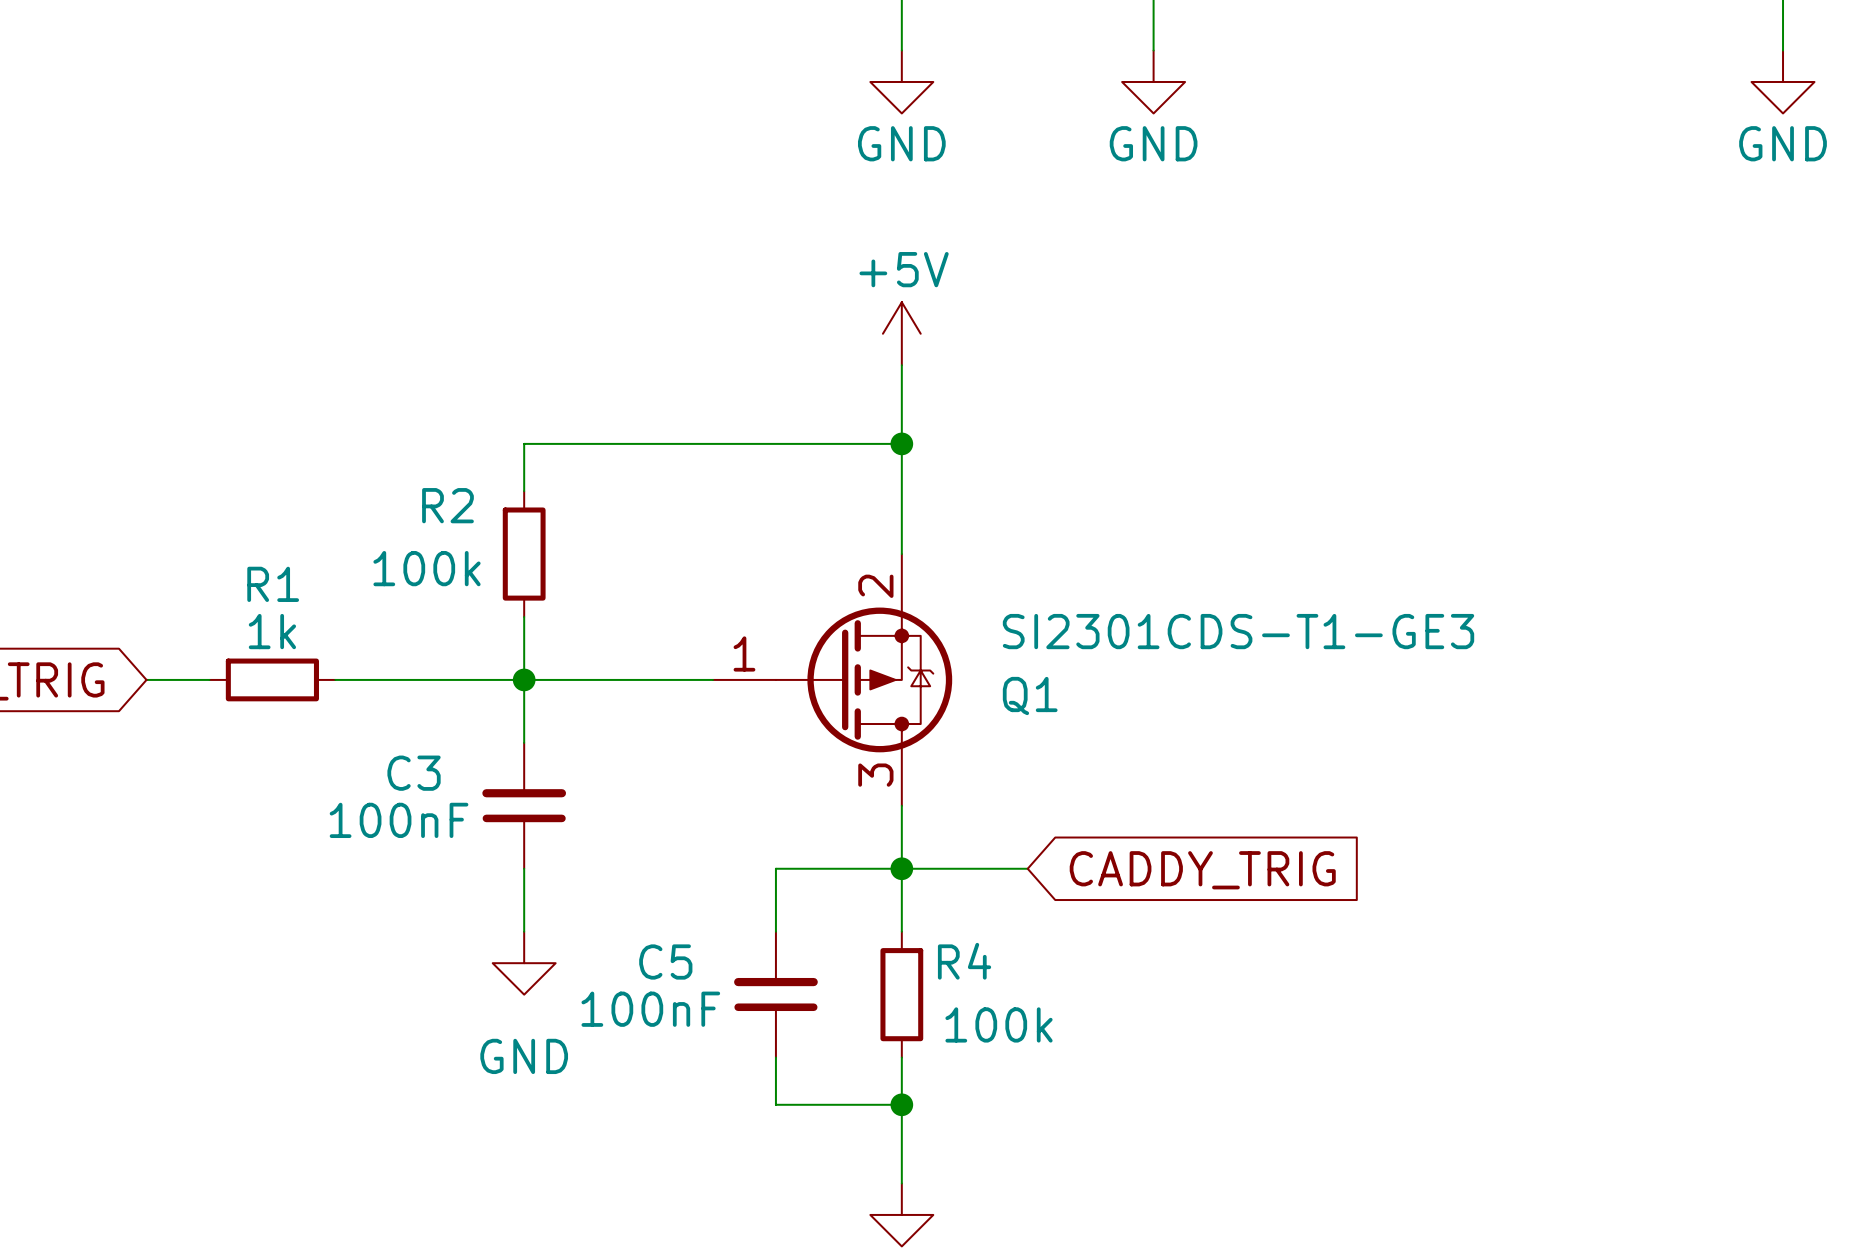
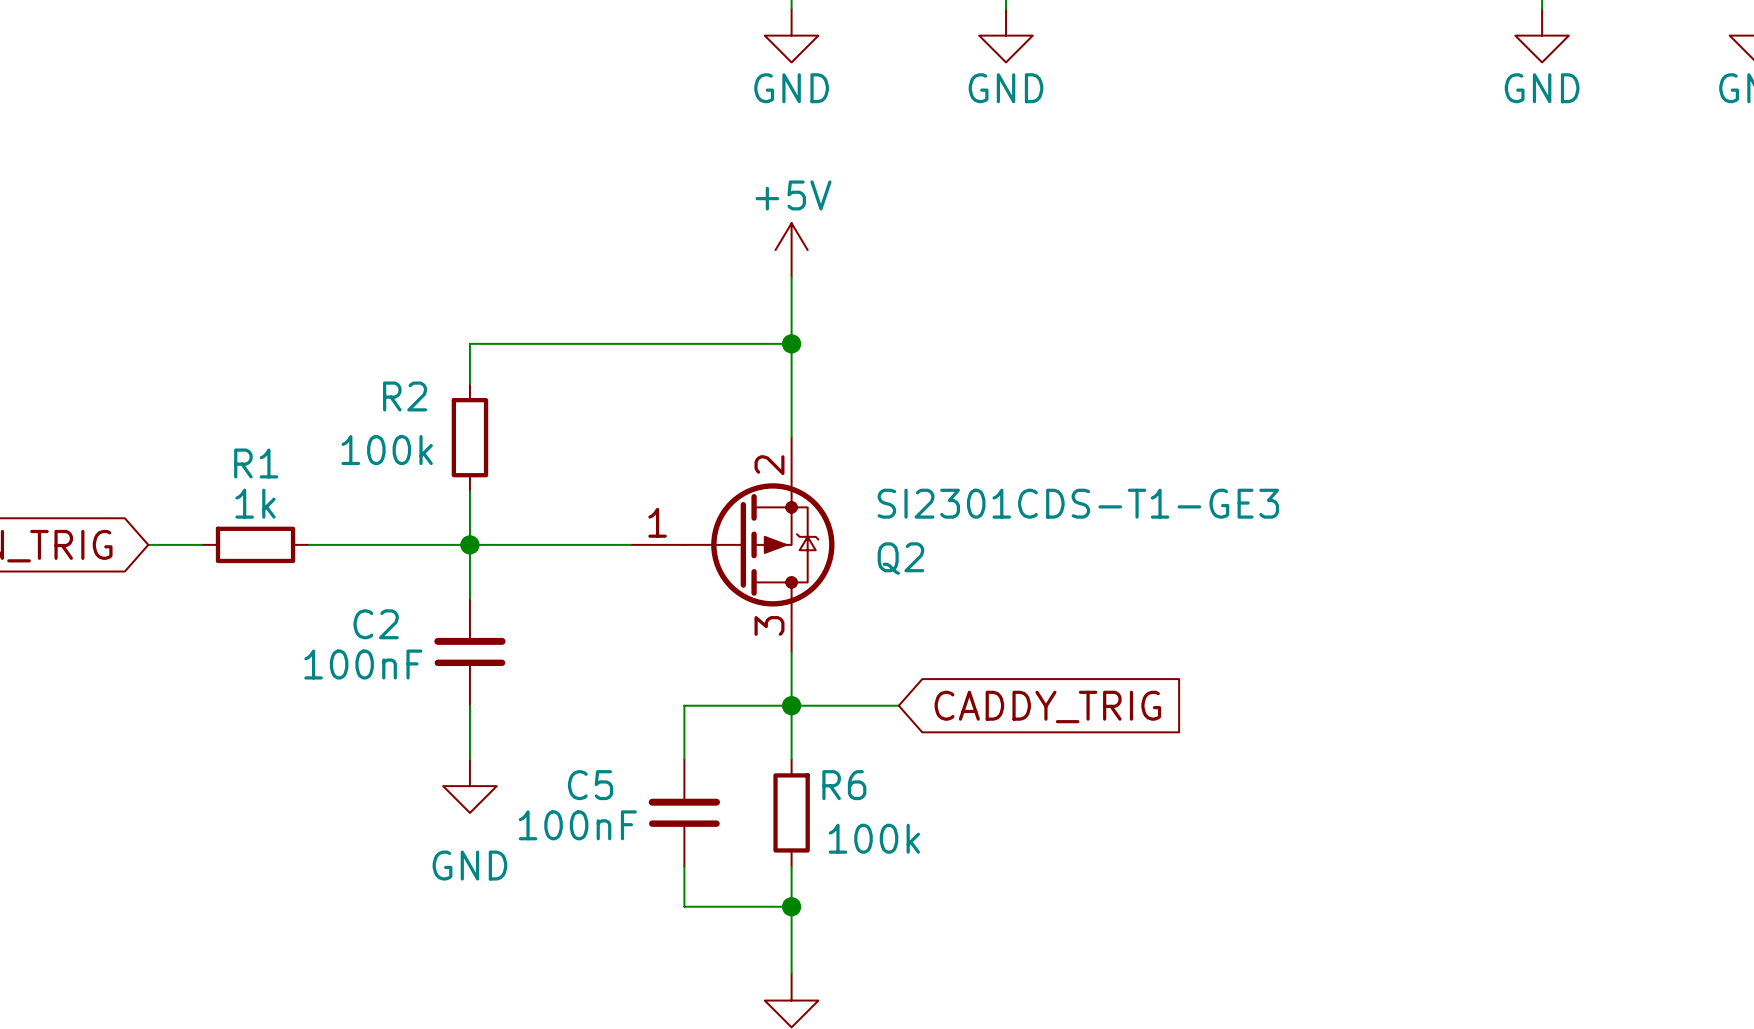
Q1 name: Q1 (1030, 696) -> Q2 (900, 558)
C3 name: C3 (414, 773) -> C2 (376, 624)
R4 name: R4 (964, 961) -> R6 (844, 785)

